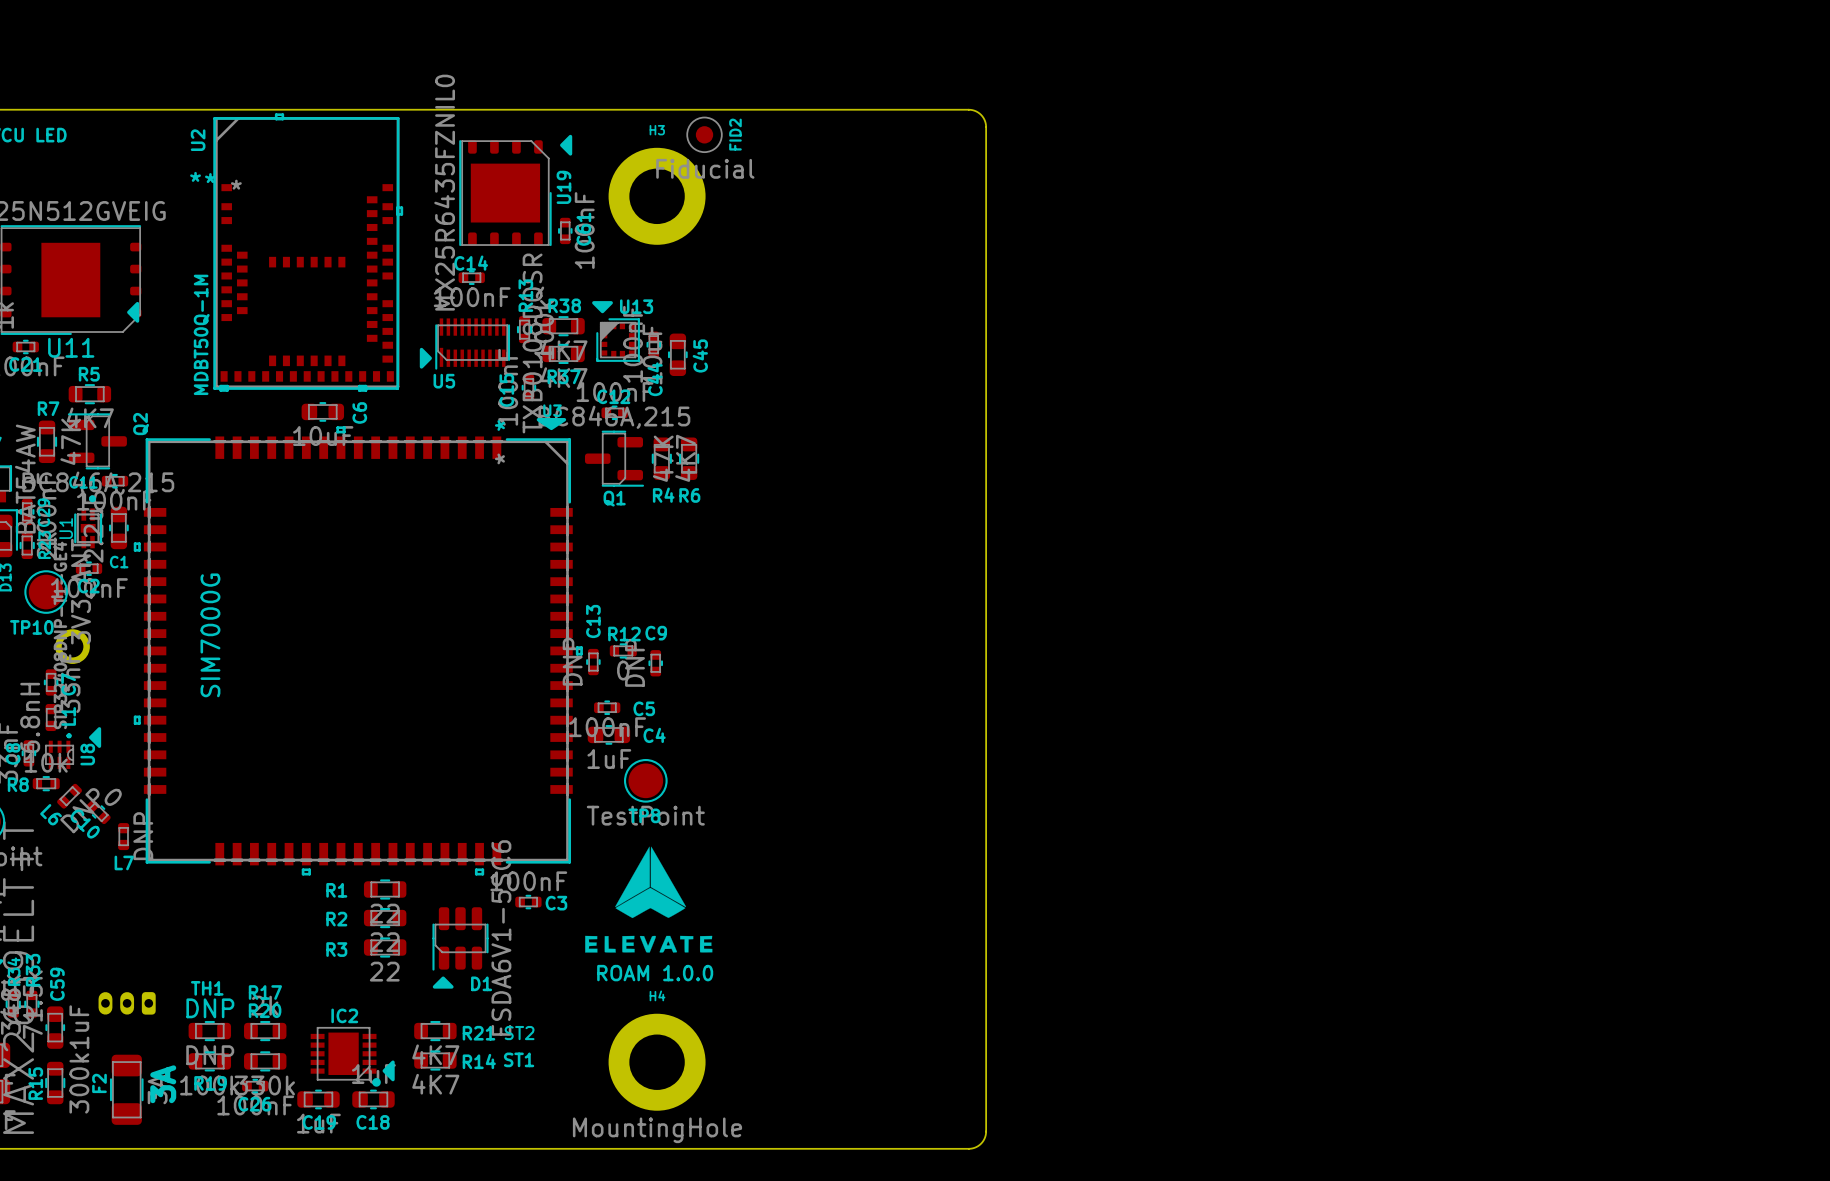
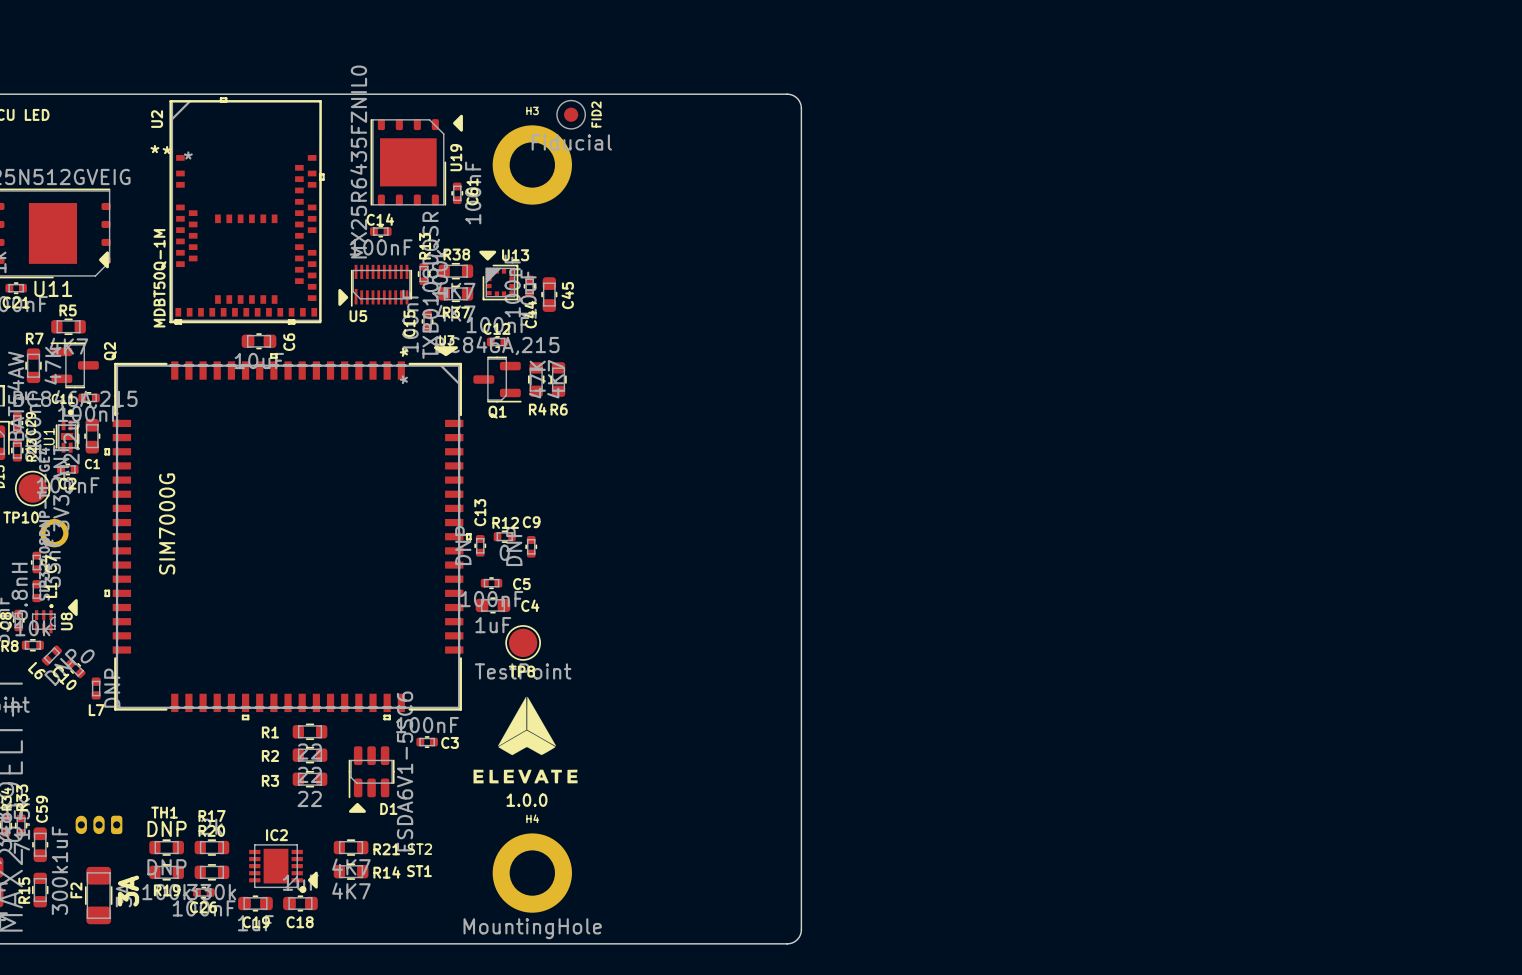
text: ROAM 1.0.0 (655, 973) -> 1.0.0 (526, 800)

